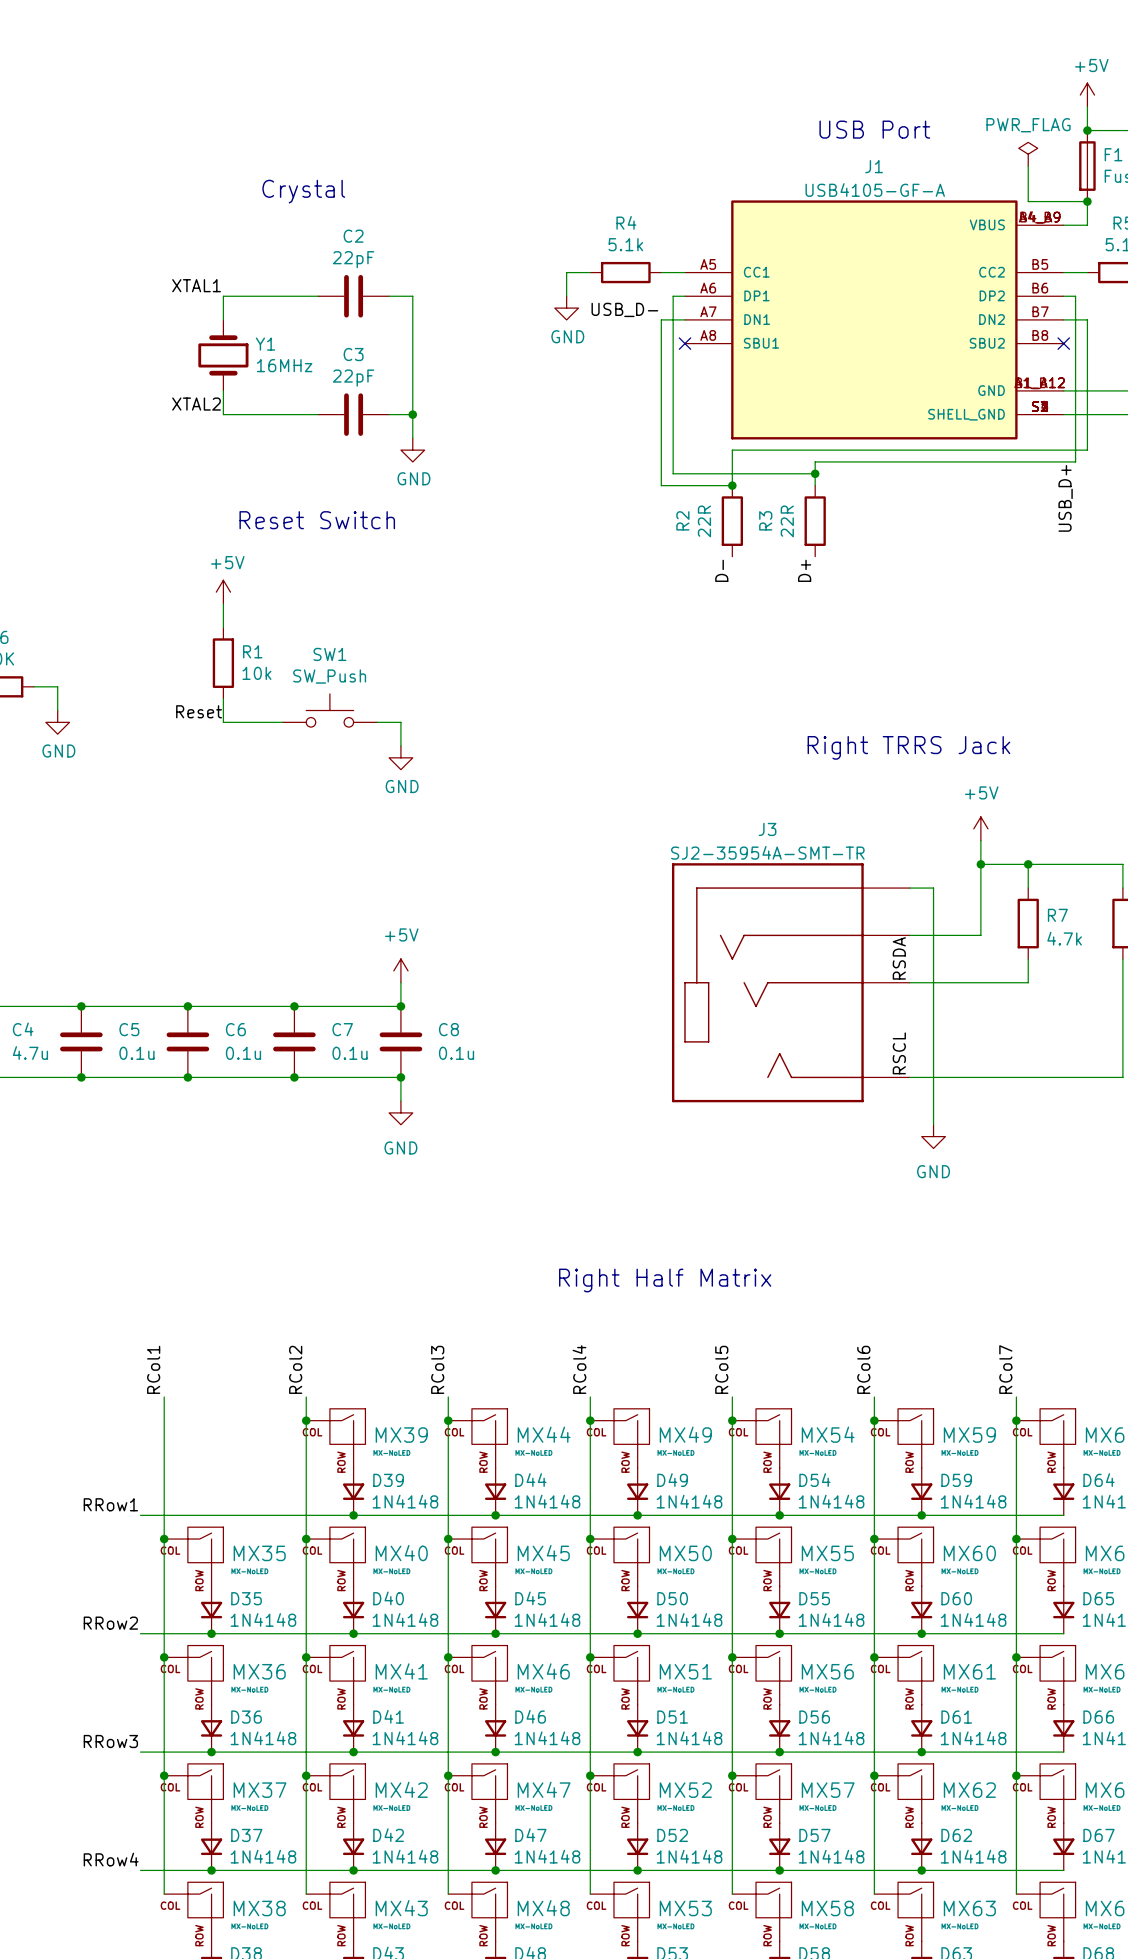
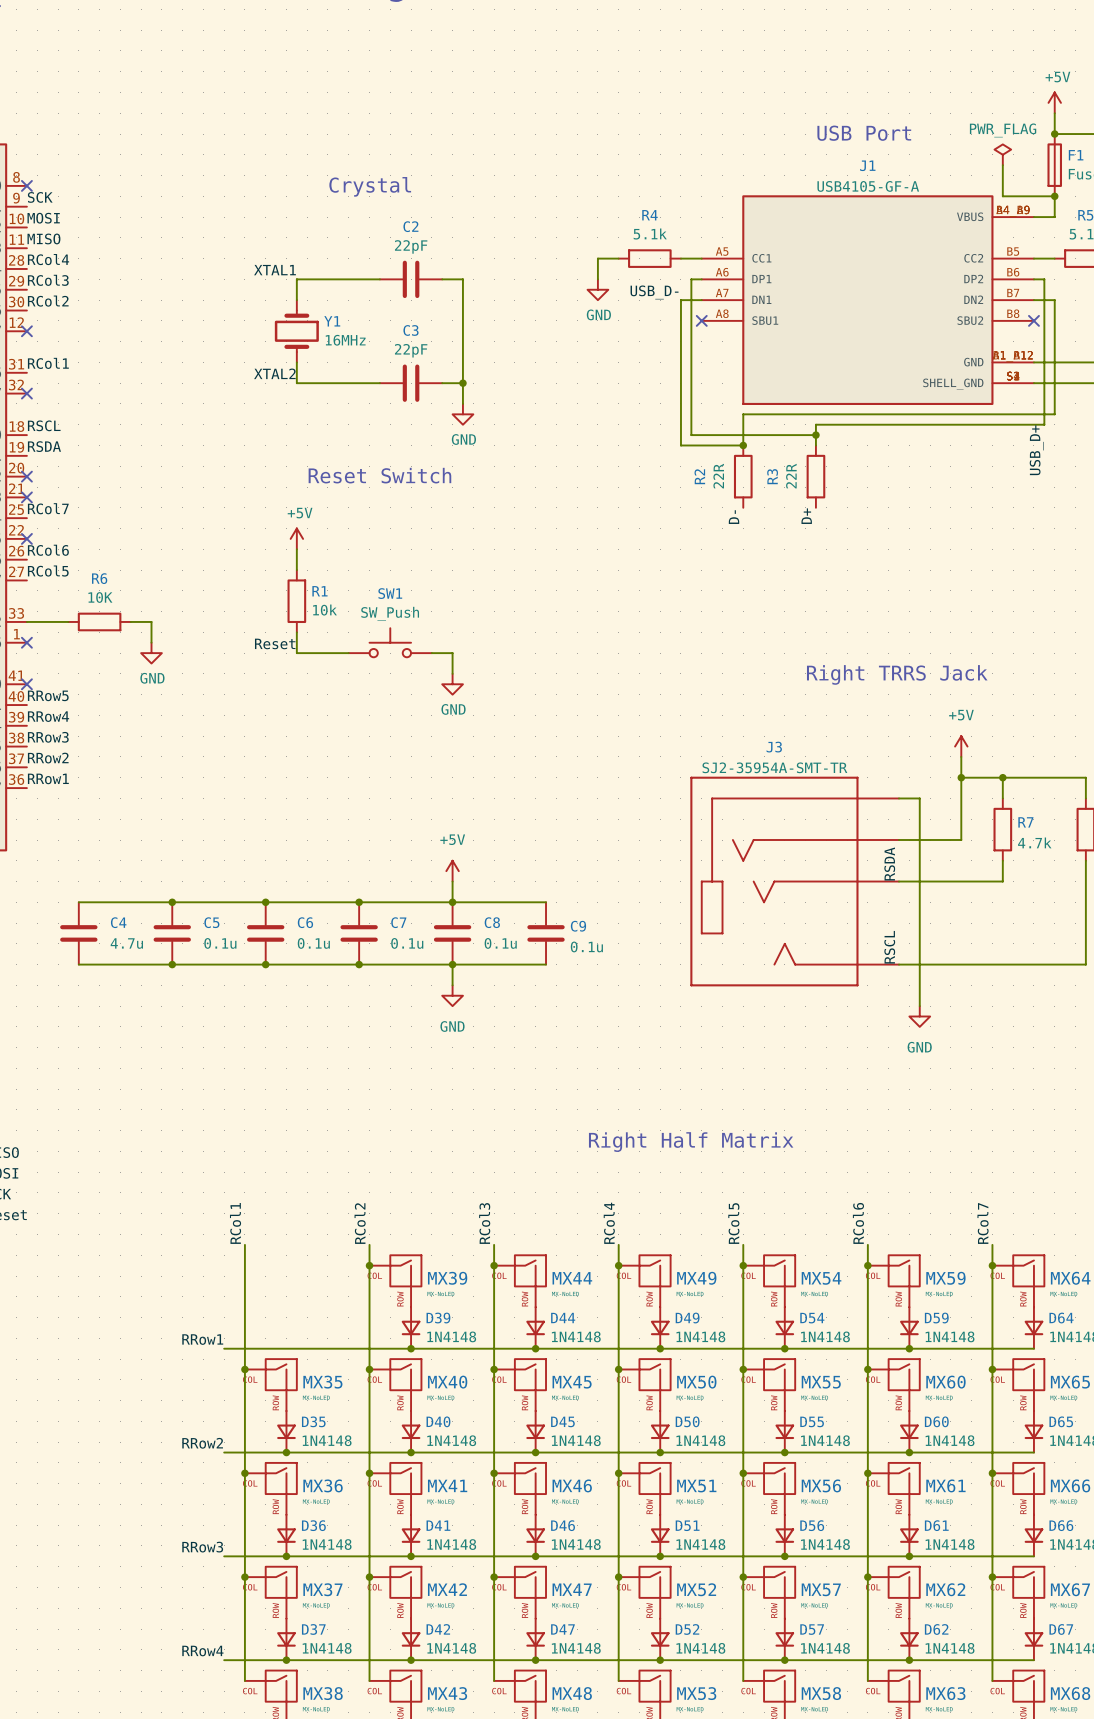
wire: none -> (452, 902) (546, 902)
C9: none -> 0.1u (546, 933)
wire: none -> (452, 964) (546, 964)

